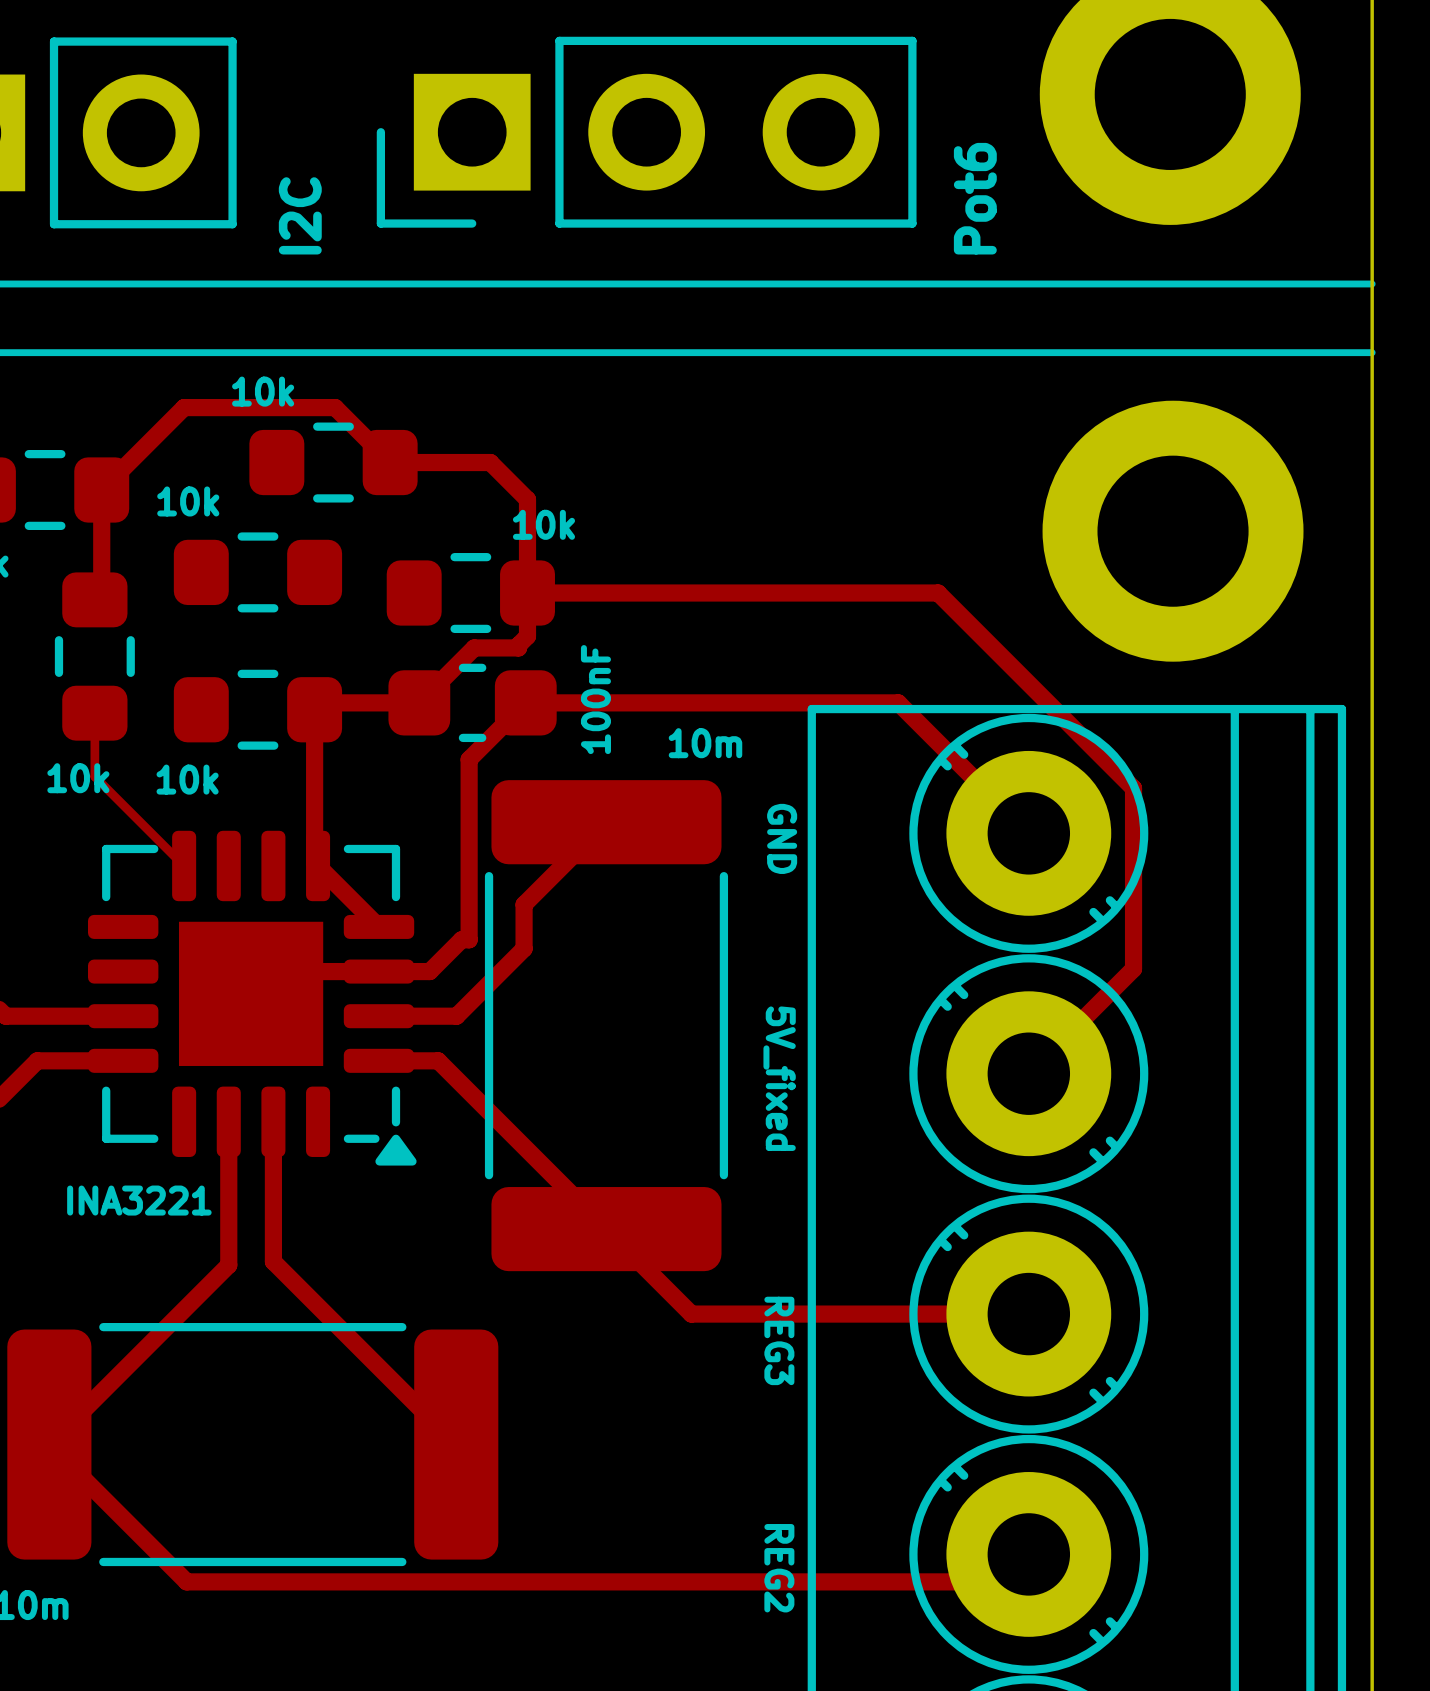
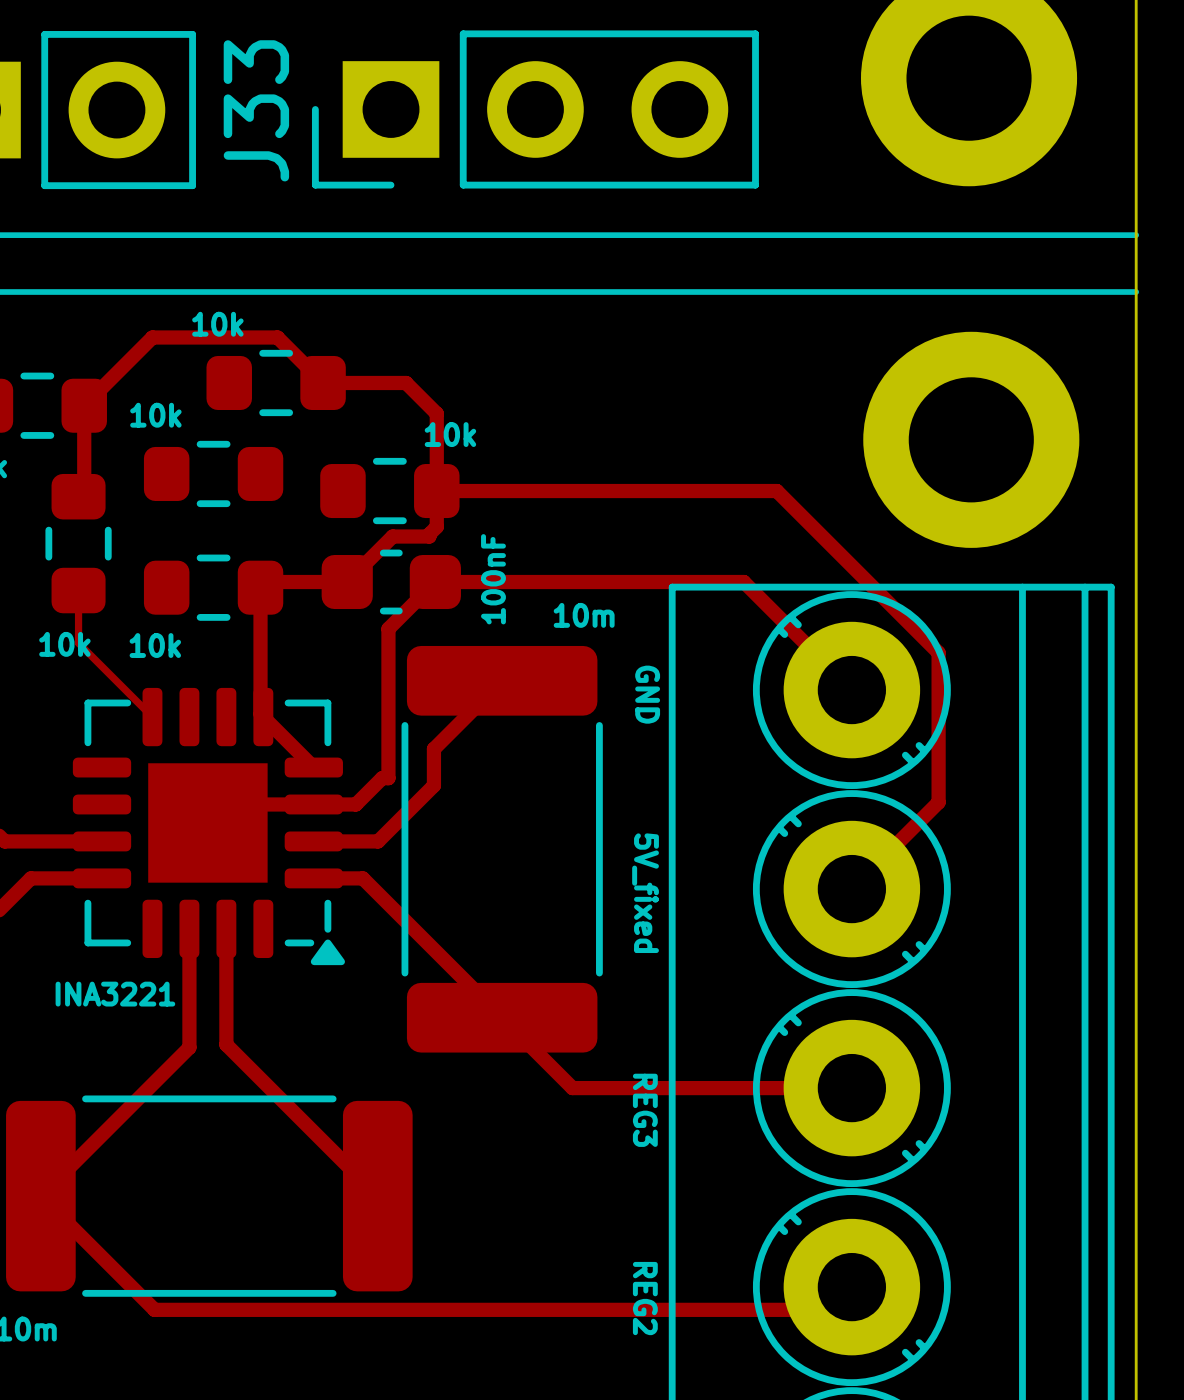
J33 name: none -> J33 (256, 110)
J33 value: Pot6 (975, 198) -> none
part value: I2C (300, 215) -> none

